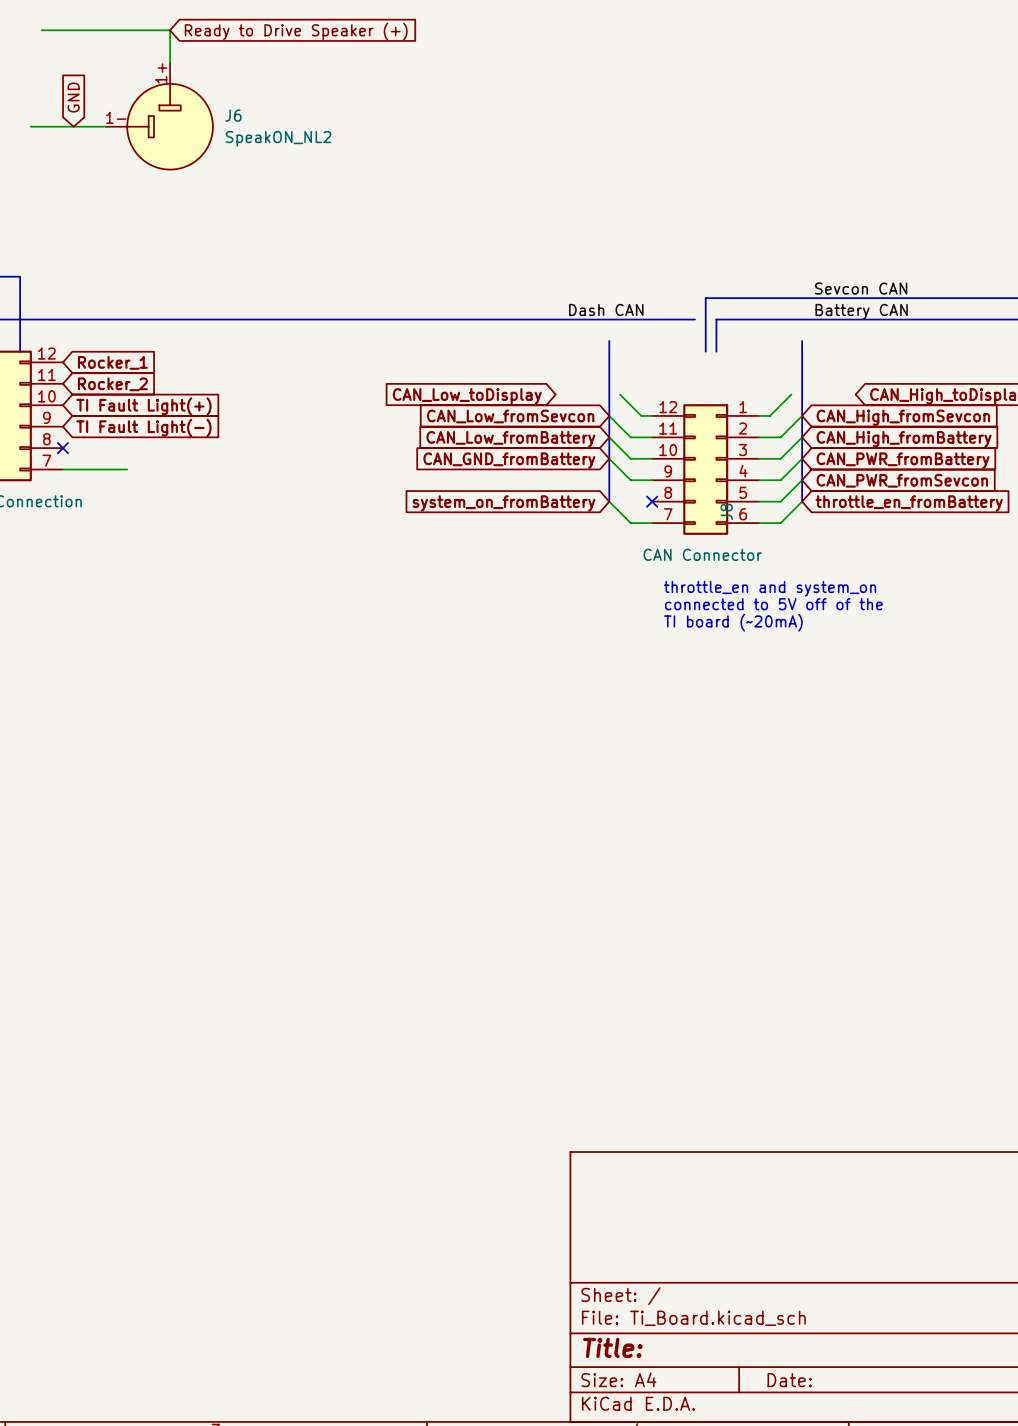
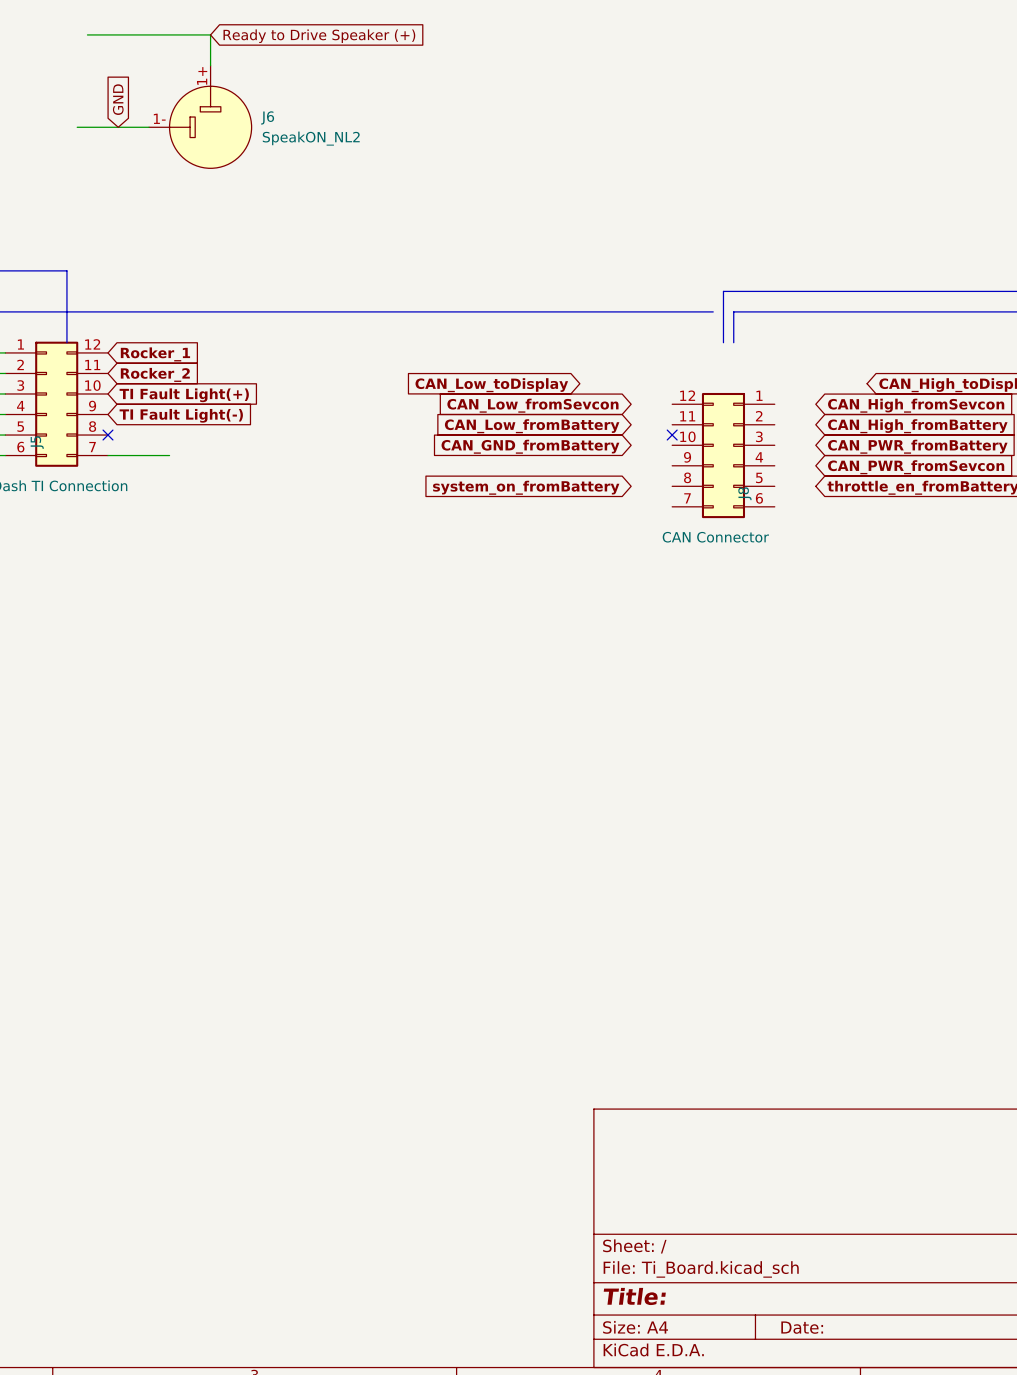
label: Sevcon CAN (861, 288) -> none
label: Dash CAN (606, 309) -> none
label: Battery CAN (861, 311) -> none
bus: (609, 340) (609, 501) -> none
bus: (802, 340) (802, 501) -> none
wire: (620, 394) (641, 415) (652, 415) -> none
wire: (791, 394) (769, 415) (759, 415) -> none
wire: (609, 415) (630, 437) (652, 437) -> none
wire: (802, 415) (780, 437) (759, 437) -> none
wire: (609, 437) (630, 458) (652, 458) -> none
wire: (802, 437) (780, 458) (759, 458) -> none
no-connect mark: none -> (672, 435)
wire: (609, 458) (630, 480) (652, 480) -> none
wire: (802, 458) (780, 480) (759, 480) -> none
wire: (802, 480) (780, 501) (759, 501) -> none
wire: (609, 501) (630, 523) (652, 523) -> none
no-connect mark: (652, 501) -> none
wire: (802, 501) (780, 523) (759, 523) -> none
text: throttle_en and system_on (770, 588) -> none
text: connected to 5V off of the (773, 604) -> none
text: TI board (~20mA) (733, 622) -> none

